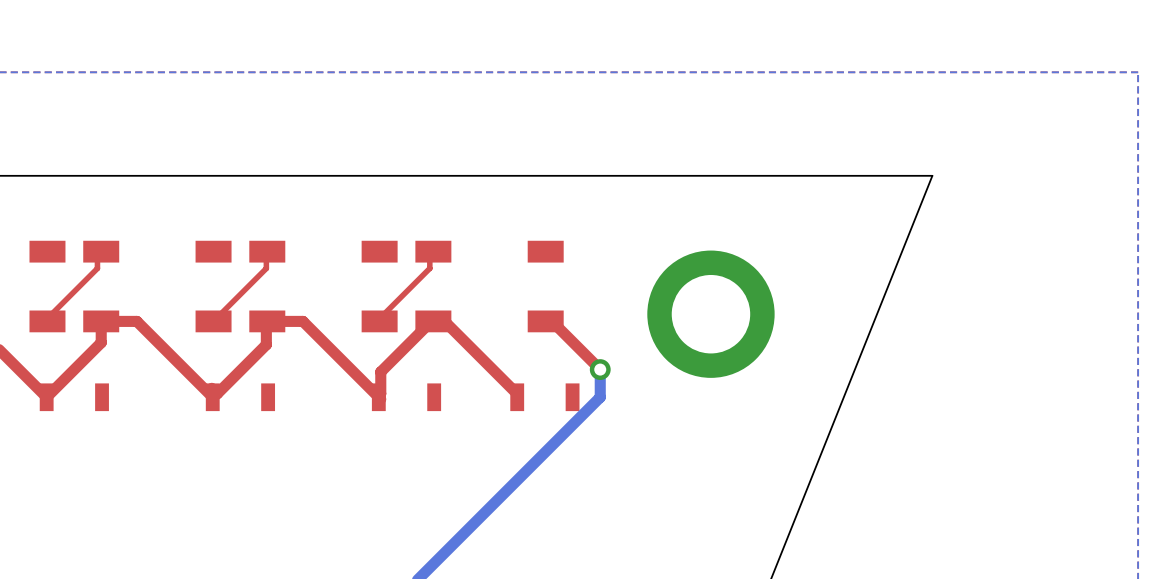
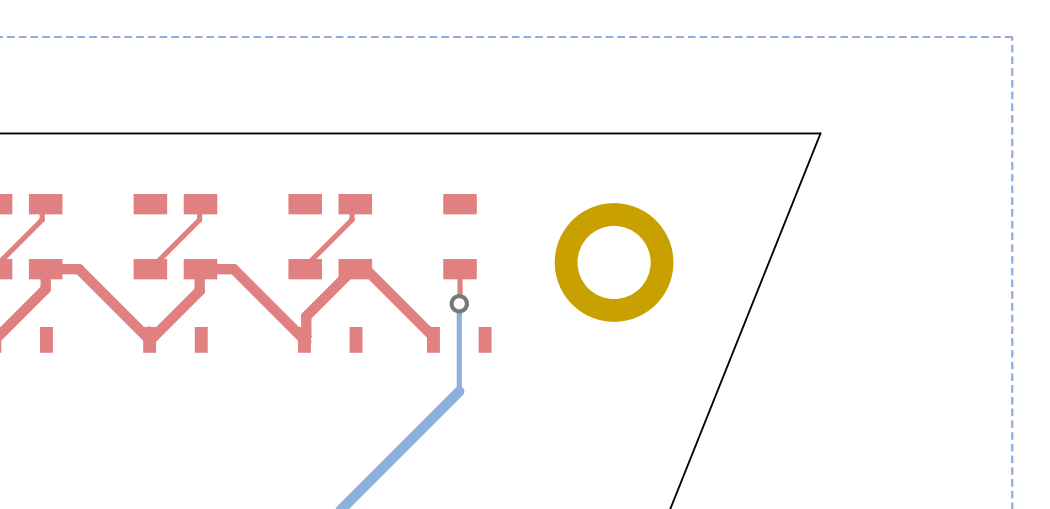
top track: (545, 321) (552, 321) (600, 369) -> (460, 269) (459, 303)
bottom track: (600, 369) (600, 397) (544, 452) -> (459, 303) (459, 391)
via position: (600, 369) -> (459, 303)

